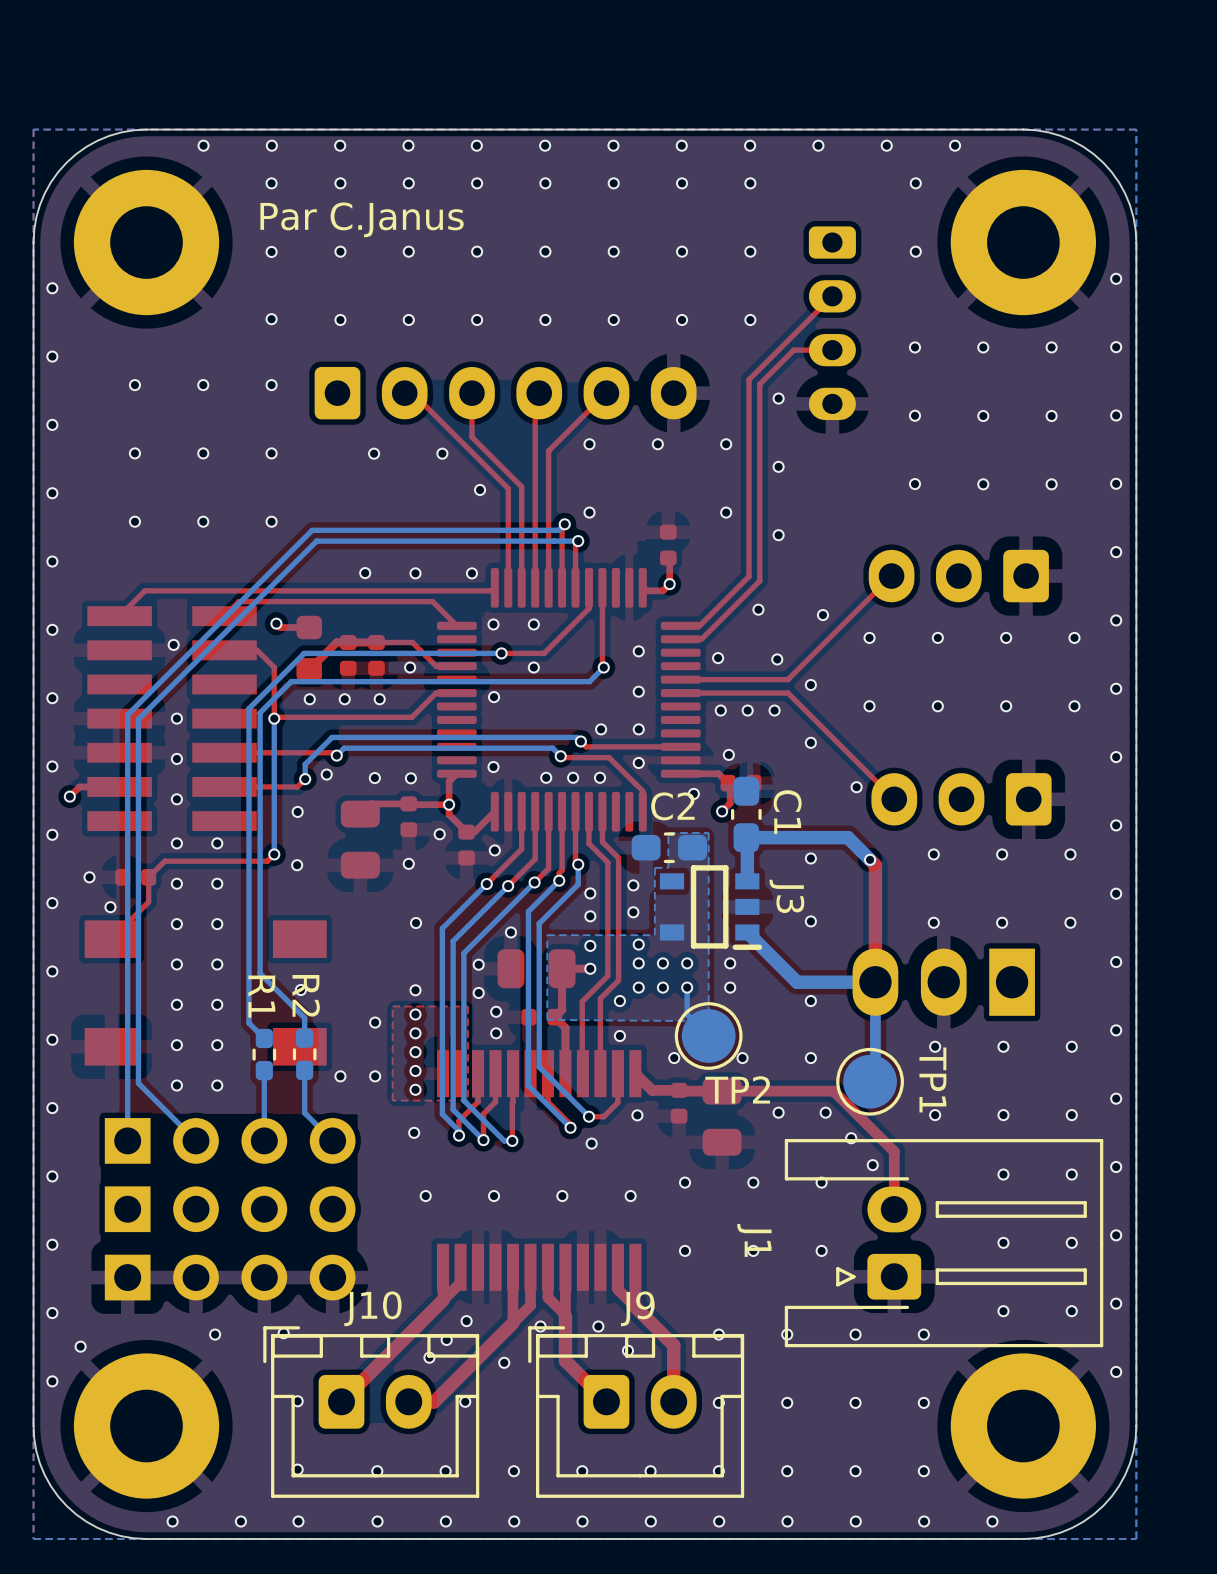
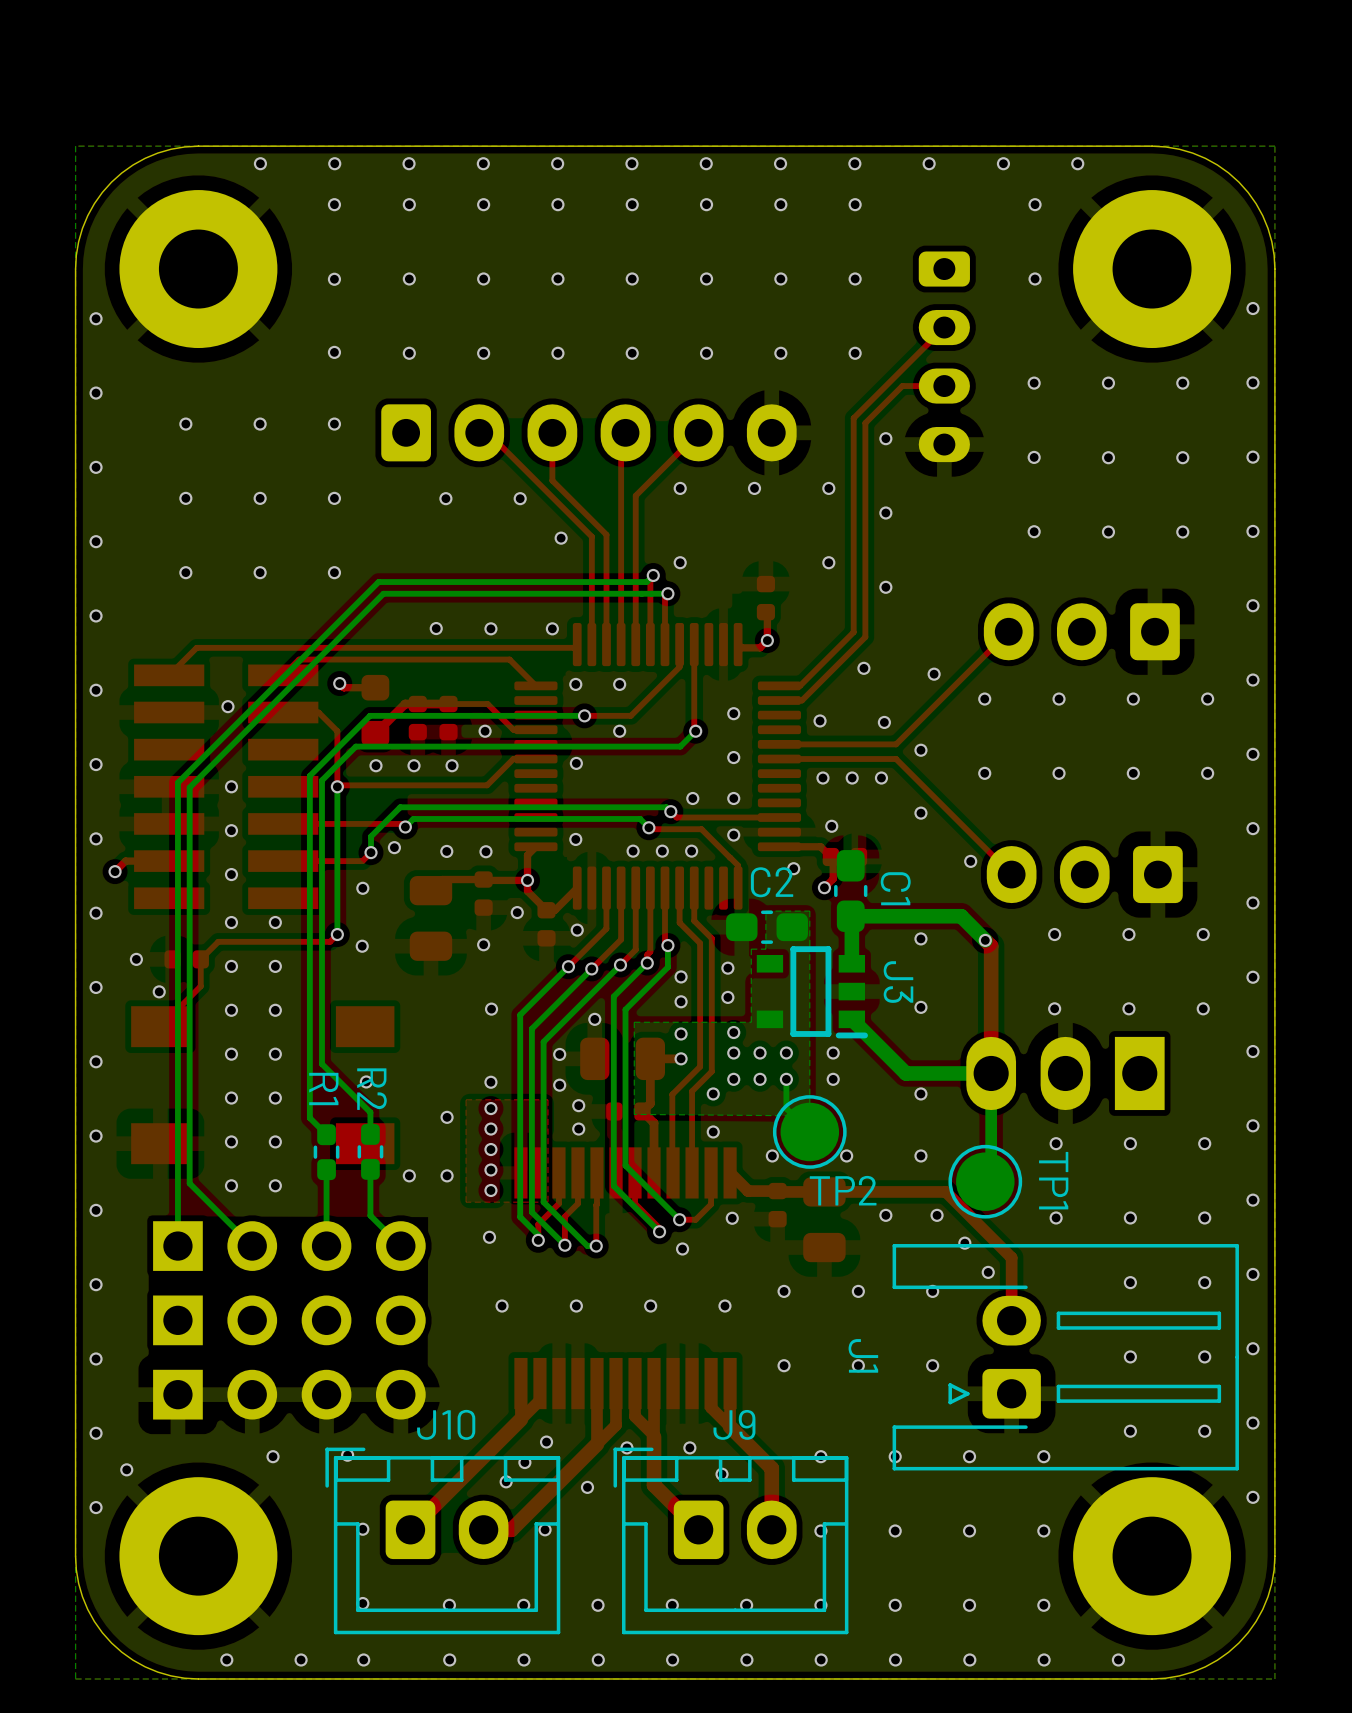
text: Par C.Janus (362, 219) -> none

